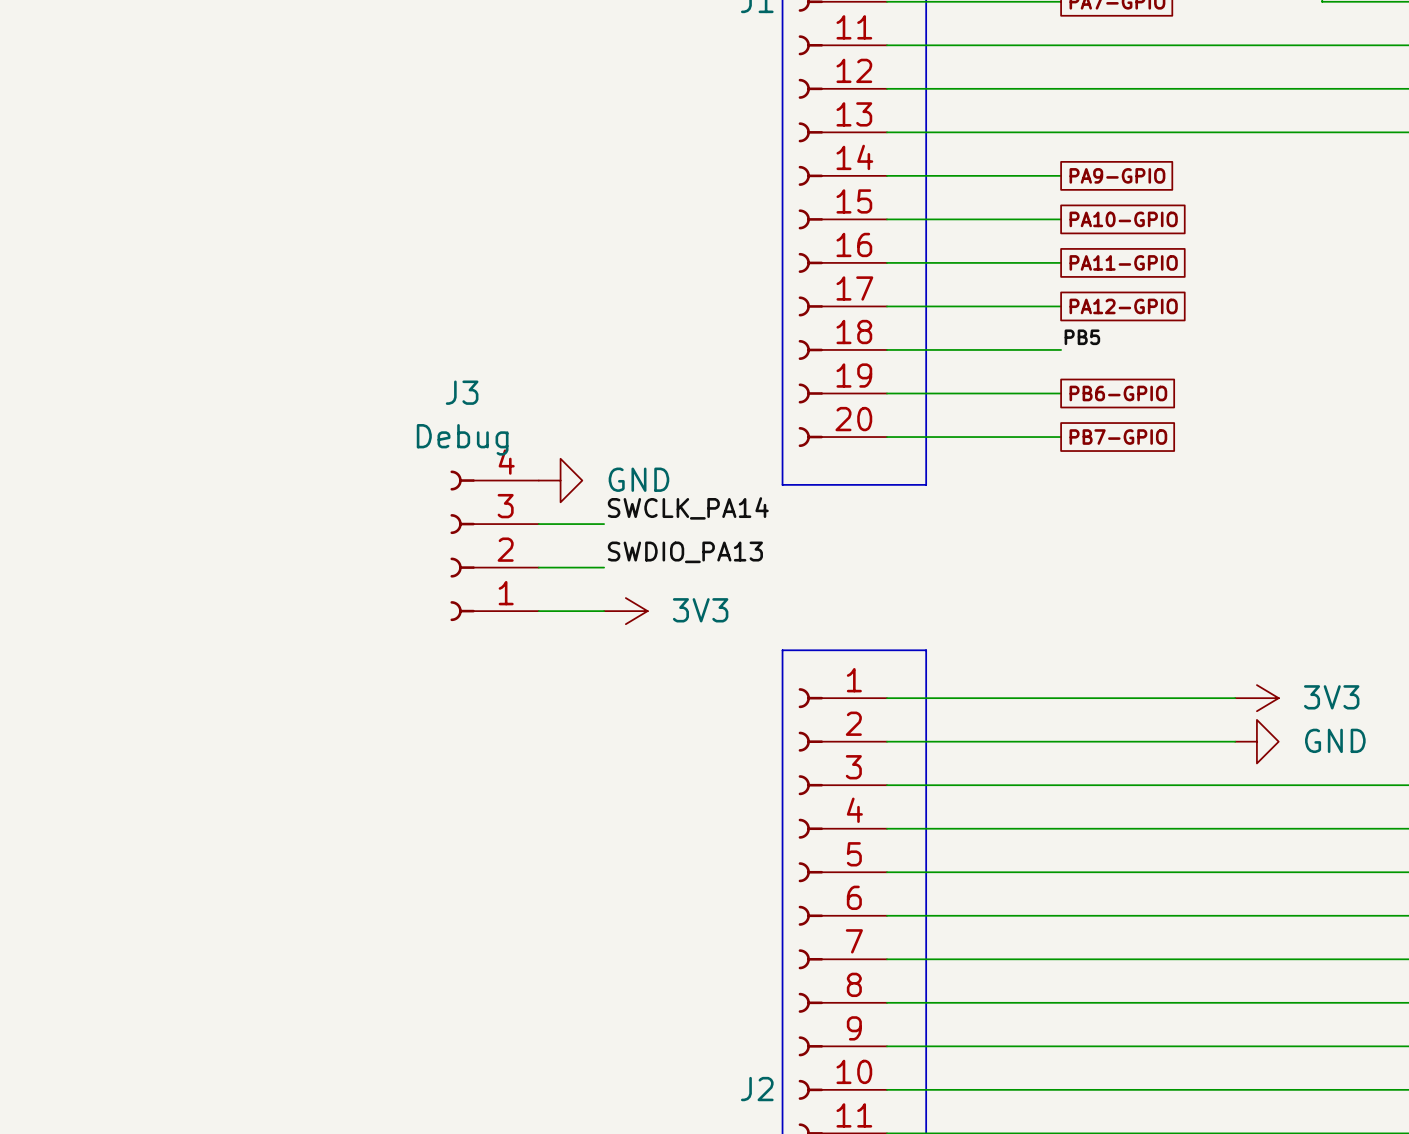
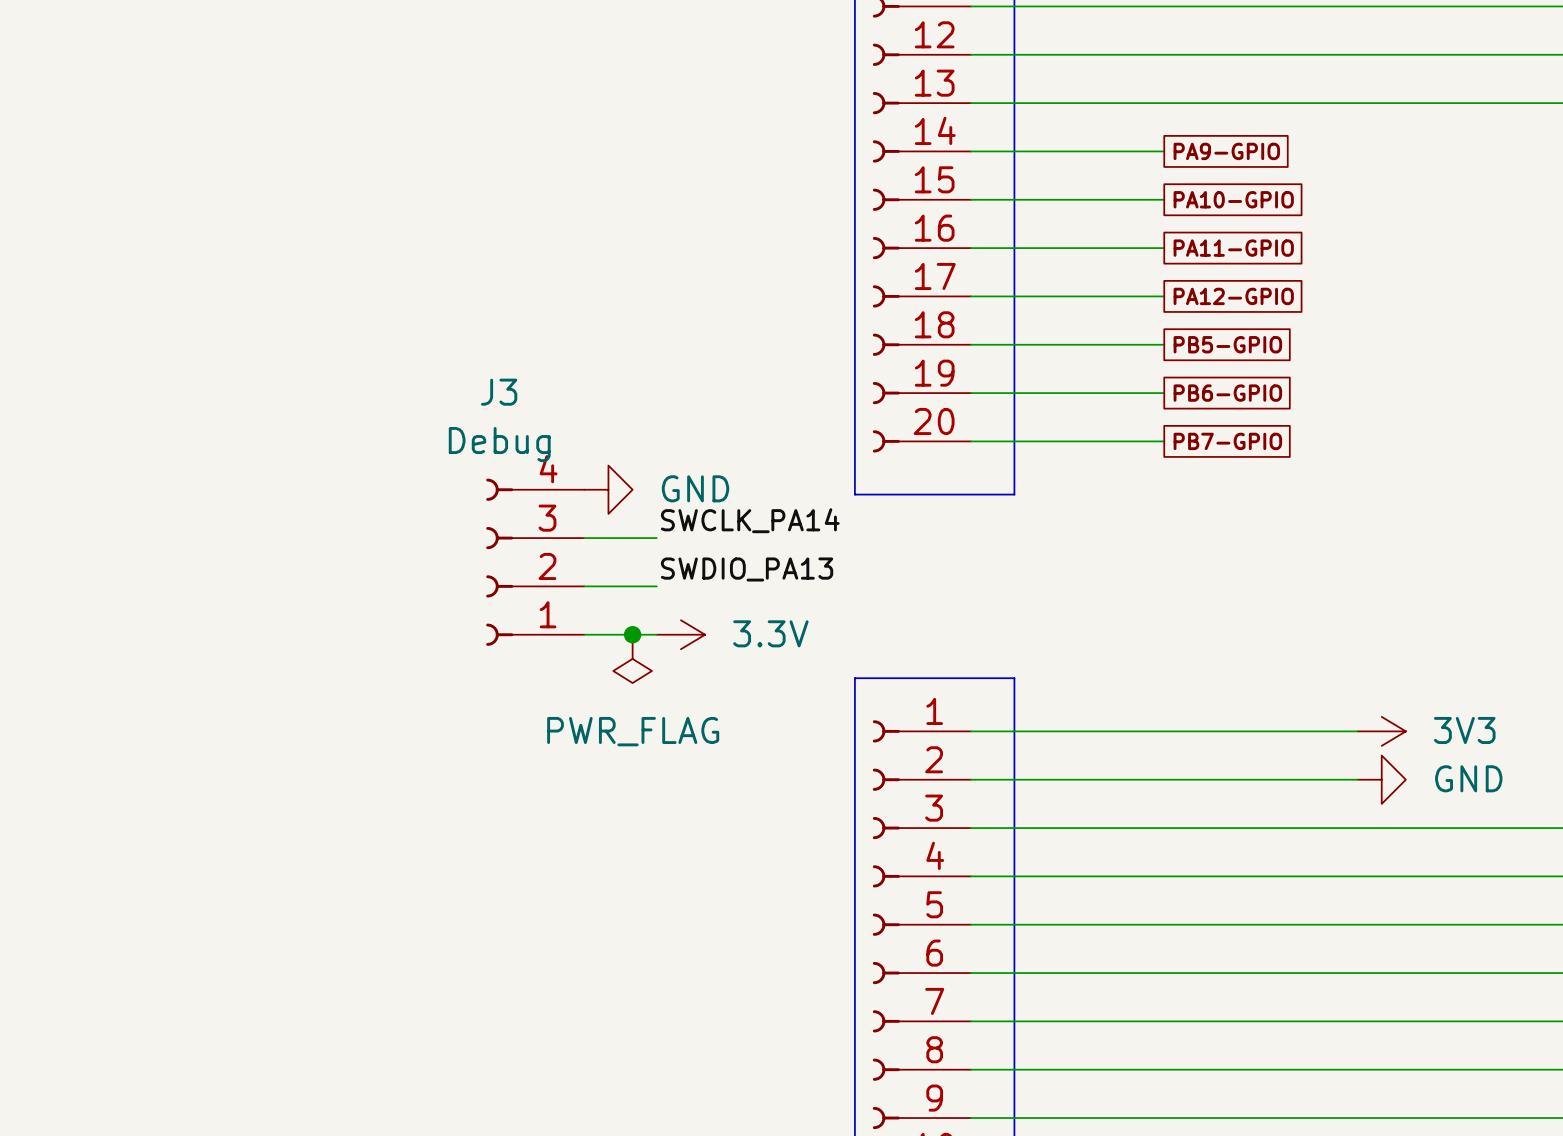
label: PB5 (1082, 337) -> none
global label: none -> PB5-GPIO (1227, 344)
junction: none -> (632, 634)
power symbol: 3V3 (625, 611) -> 3.3V (680, 634)
power symbol: none -> PWR_FLAG (632, 658)

